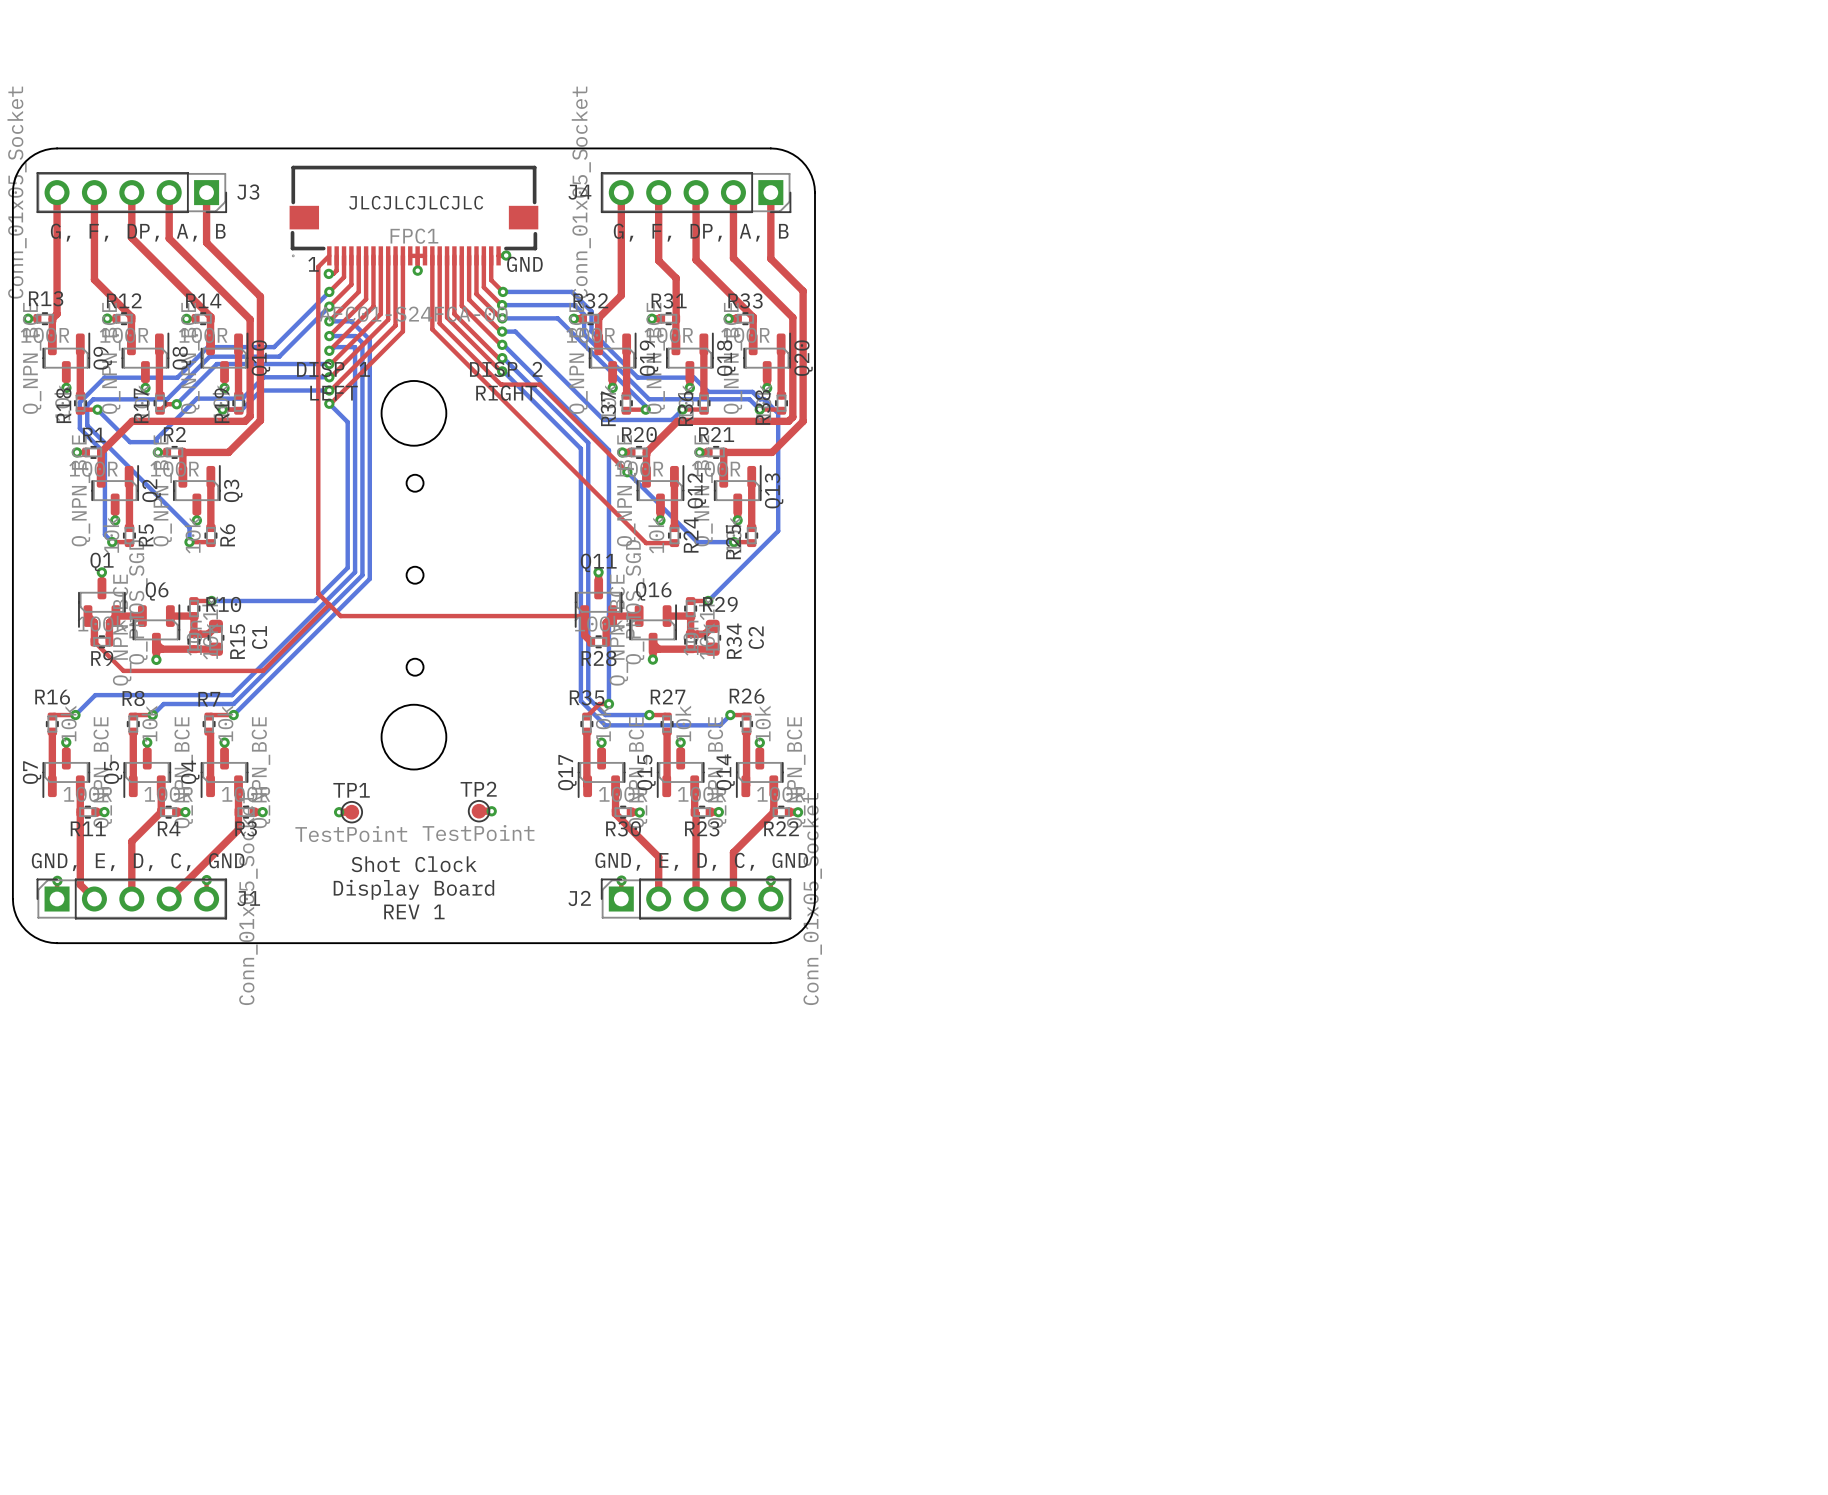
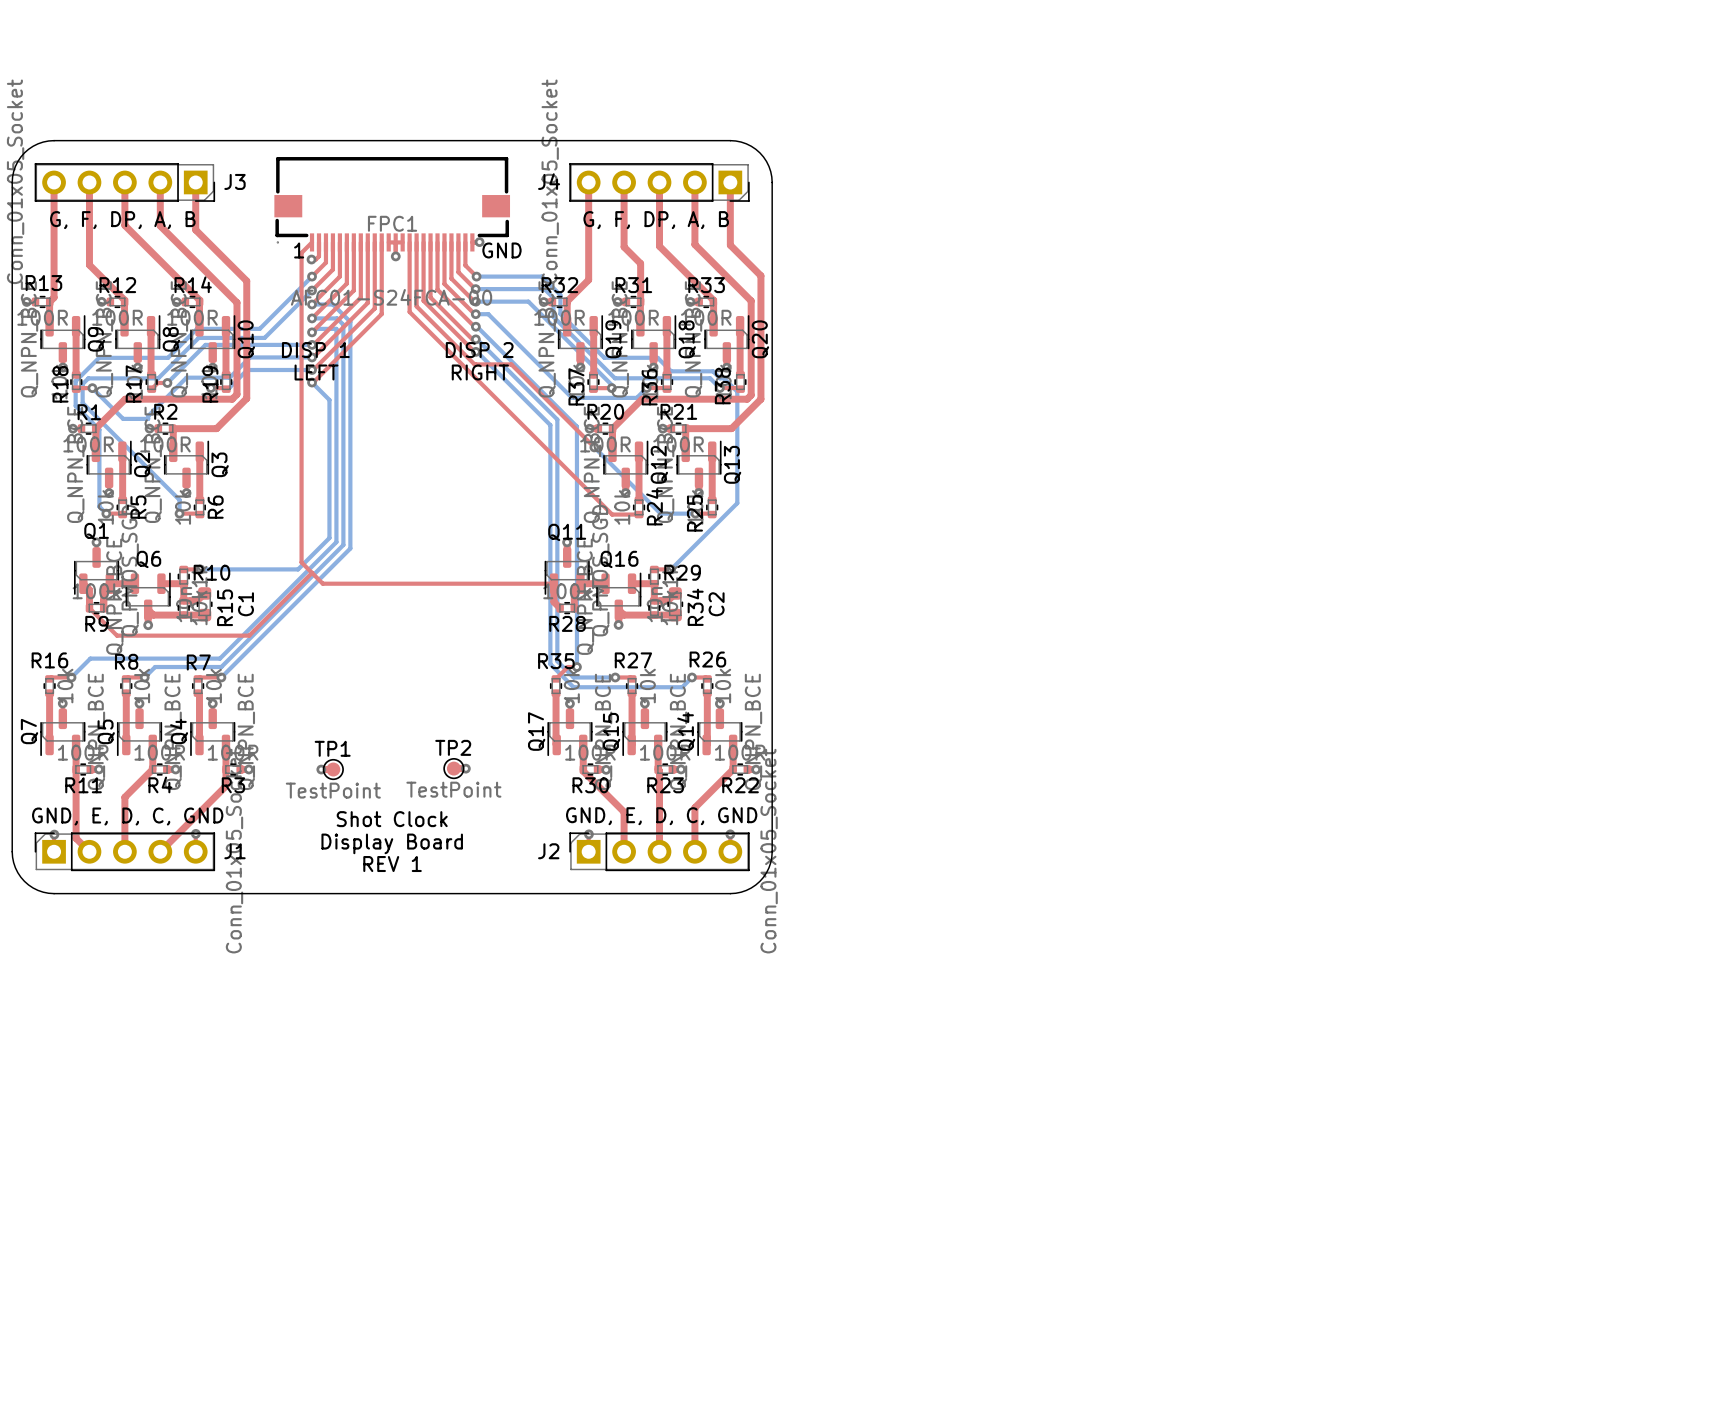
text: JLCJLCJLCJLC (416, 202) -> none
round board edge: [380, 380, 448, 447] -> none
round board edge: [405, 474, 425, 493] -> none
round board edge: [405, 566, 425, 585] -> none
round board edge: [405, 658, 425, 677] -> none
round board edge: [380, 704, 448, 771] -> none

